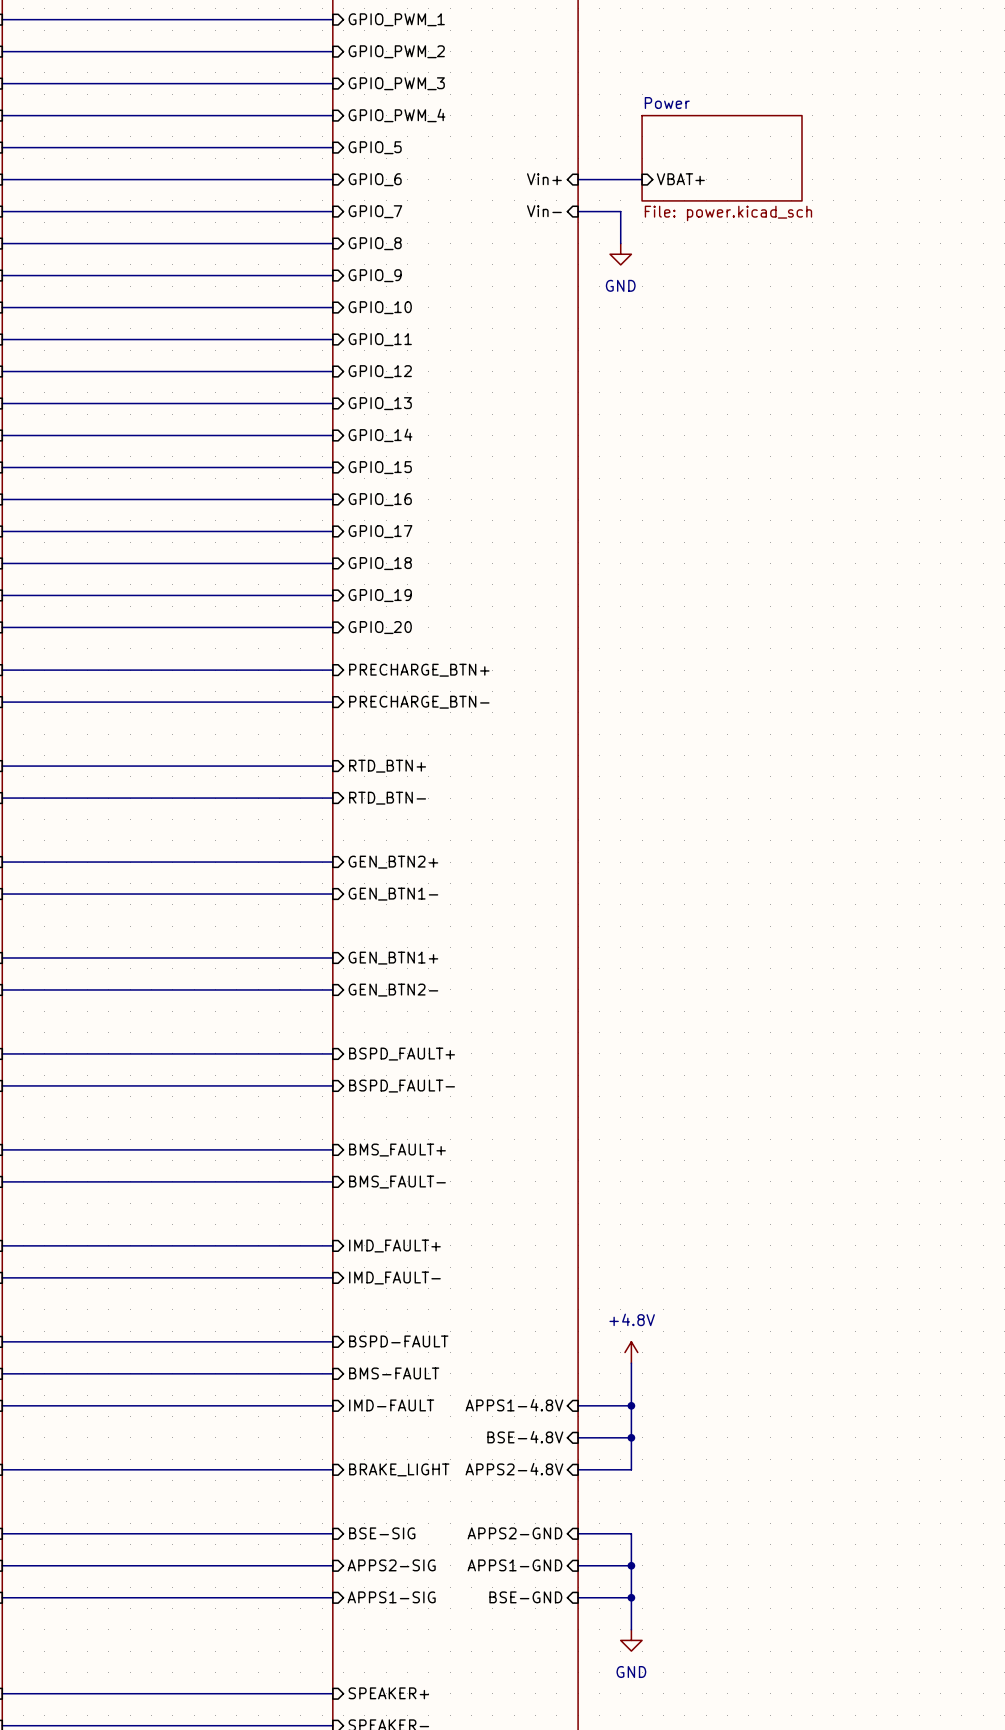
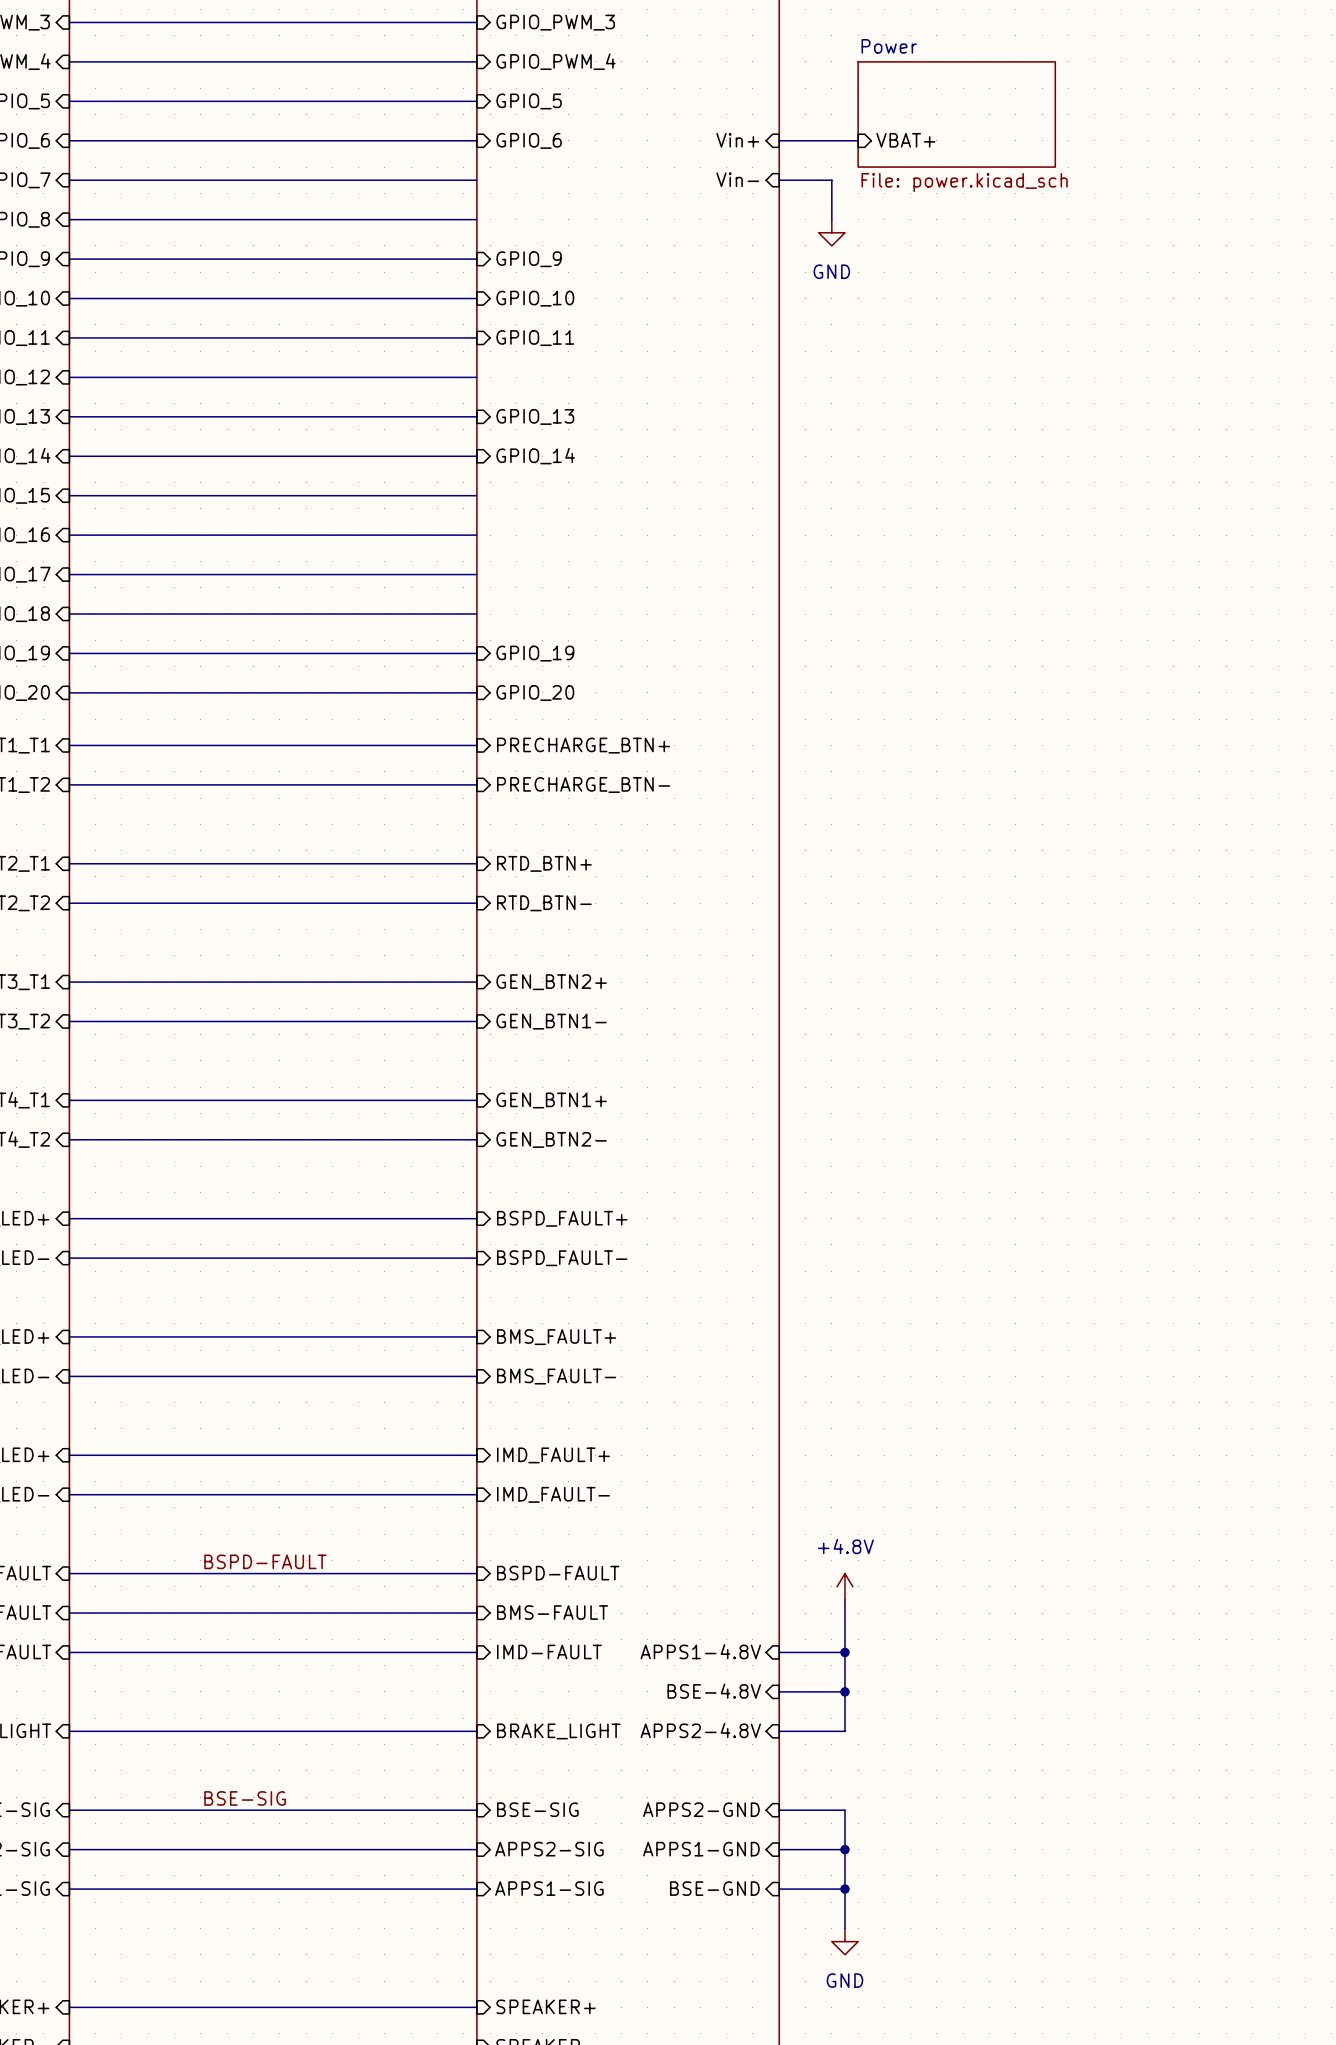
sheet pin: GPIO_7 (375, 211) -> none
sheet pin: GPIO_8 (375, 243) -> none
sheet pin: GPIO_12 (380, 371) -> none
sheet pin: GPIO_15 (380, 467) -> none
sheet pin: GPIO_16 (380, 499) -> none
sheet pin: GPIO_17 (380, 531) -> none
sheet pin: GPIO_18 (380, 563) -> none
label: none -> BSPD-FAULT (265, 1561)
label: none -> BSE-SIG (245, 1798)

